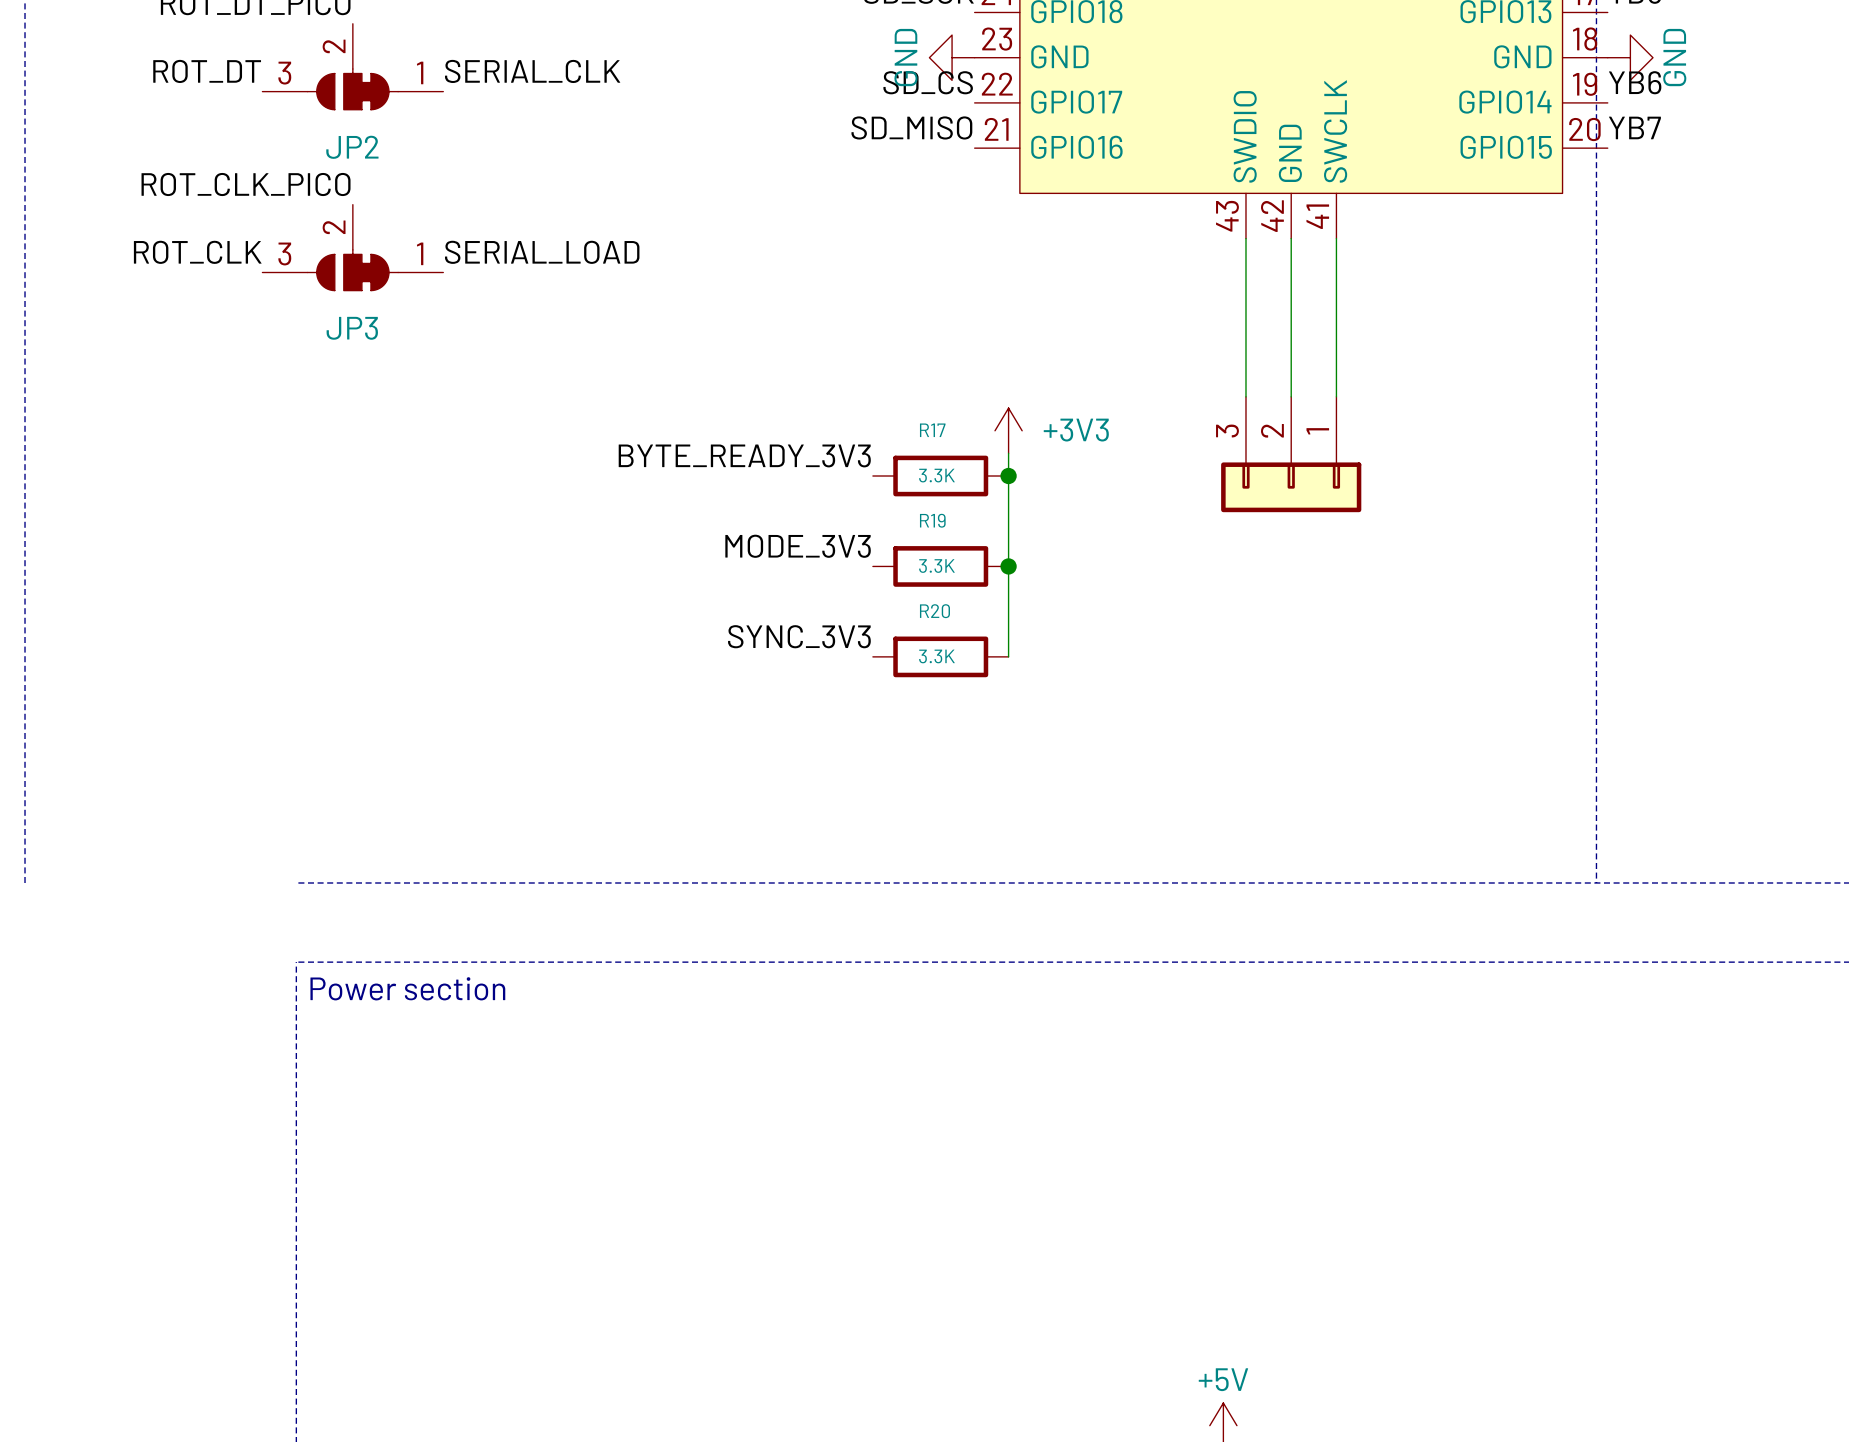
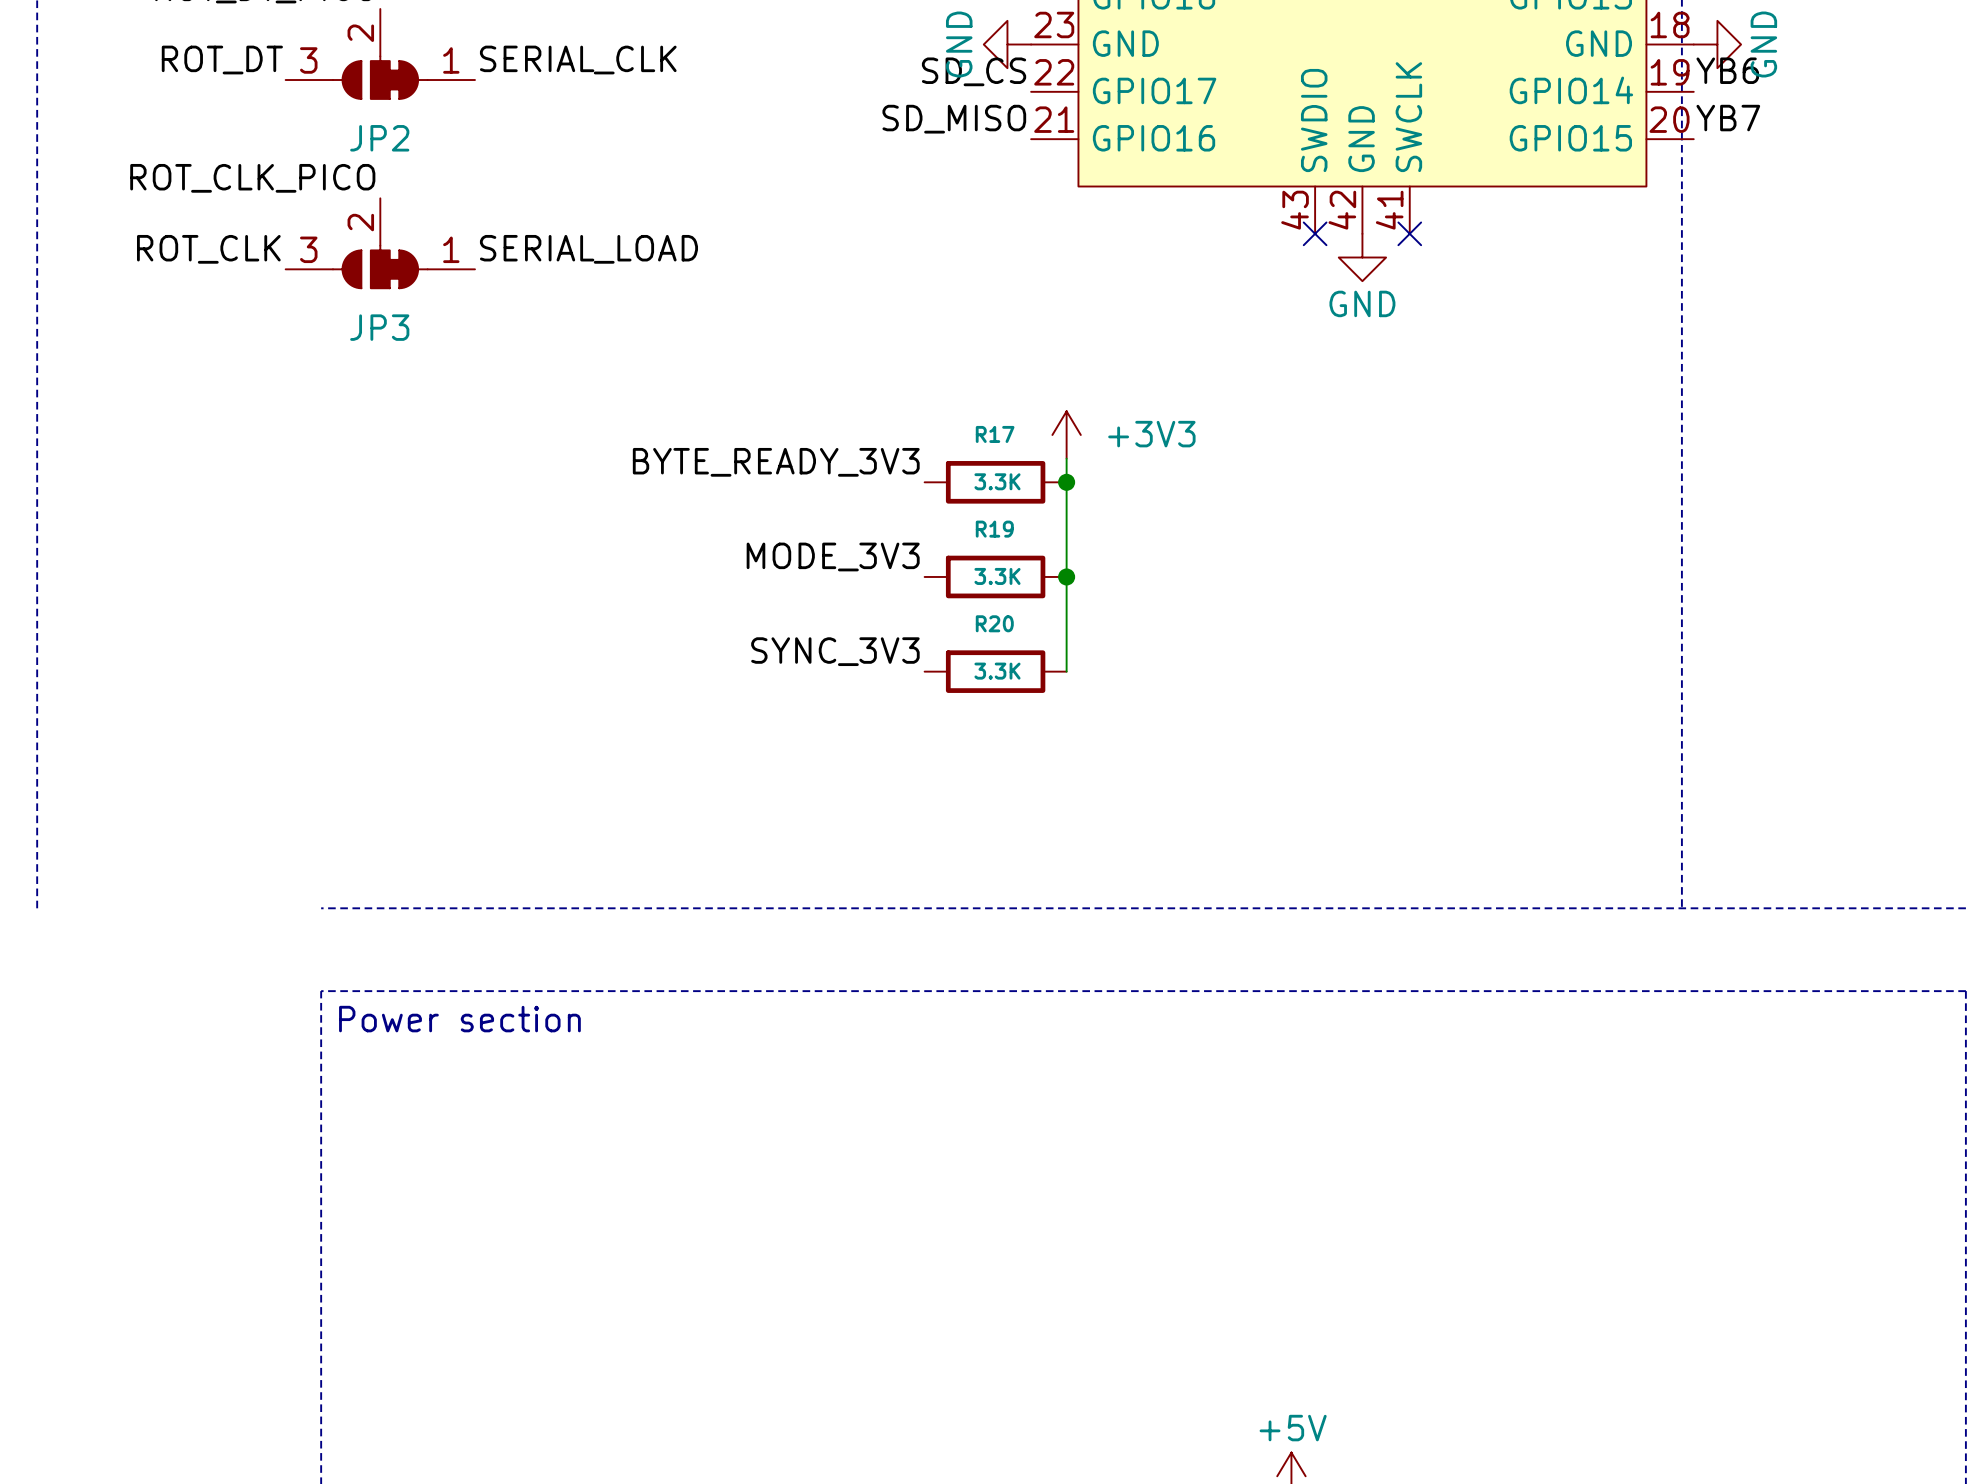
wire: (1245, 238) (1245, 396) -> none
no-connect mark: none -> (1315, 233)
wire: (1291, 238) (1291, 396) -> none
wire: (1336, 238) (1336, 396) -> none
no-connect mark: none -> (1409, 233)
power symbol: none -> GND (1362, 257)
part: (1291, 454) -> none

